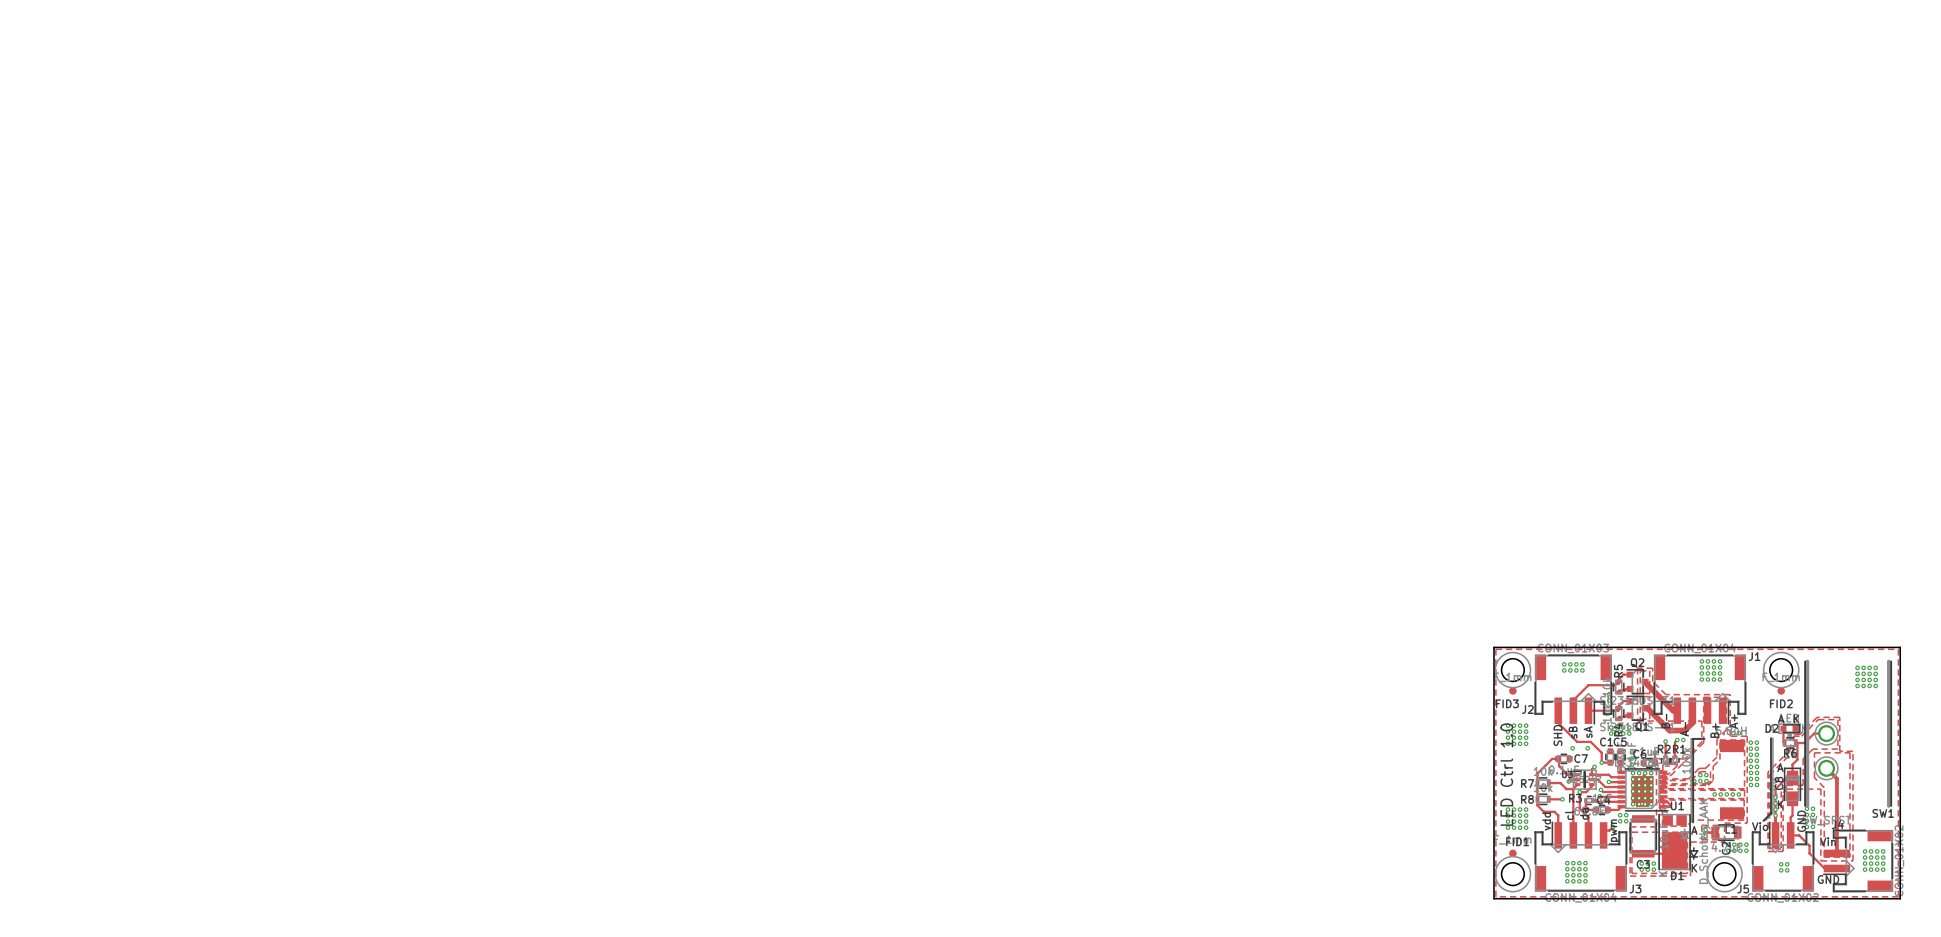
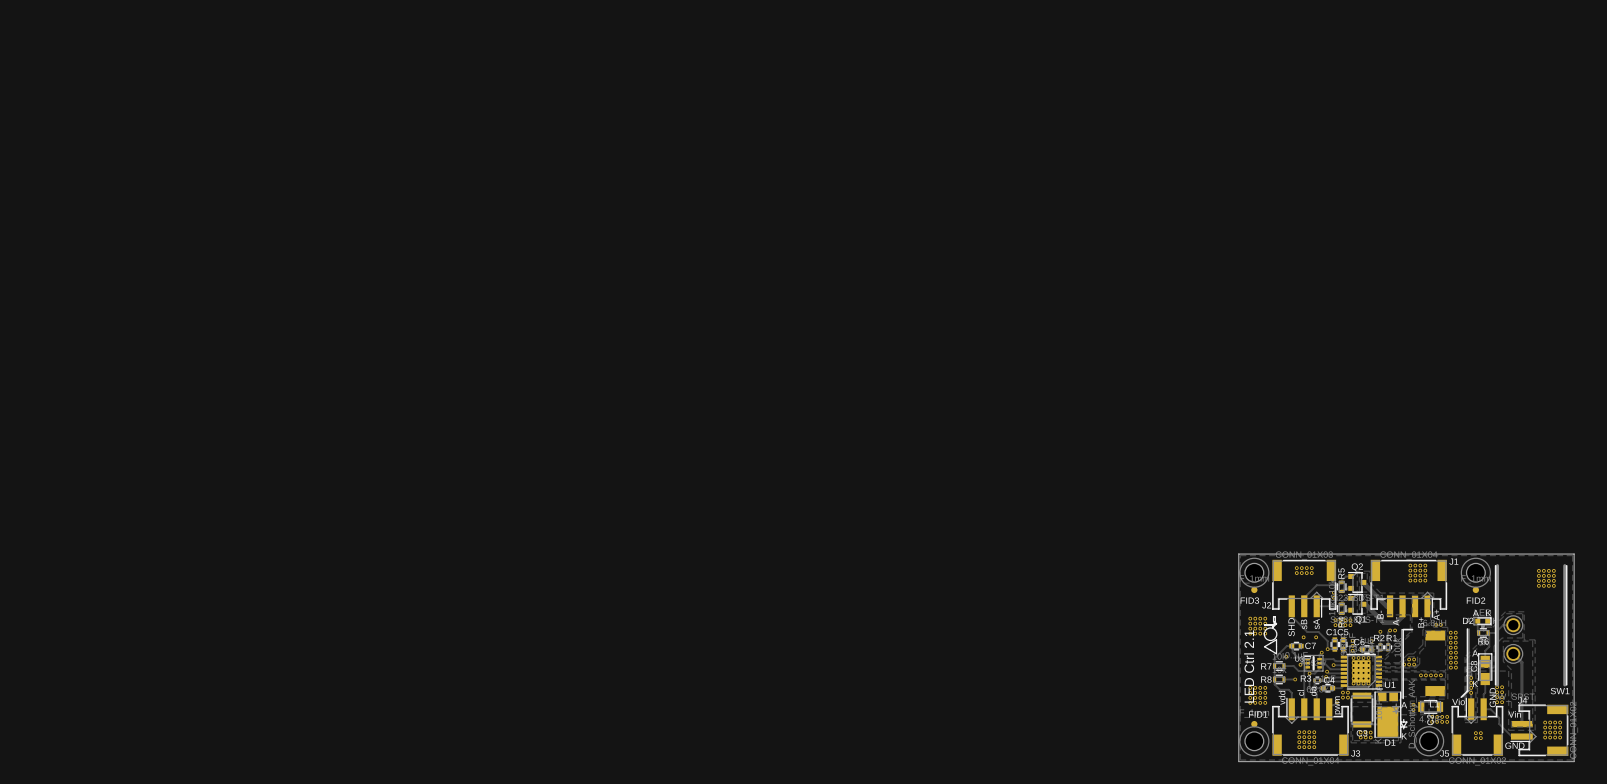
drawing: none -> [28, 26, 1278, 655]
text: LED Ctrl 1.0 (1506, 774) -> LED Ctrl 2.1 (1249, 666)

